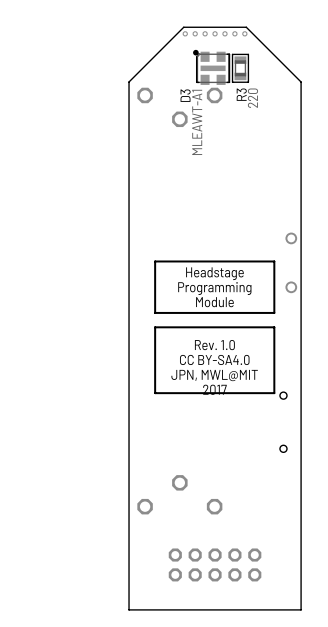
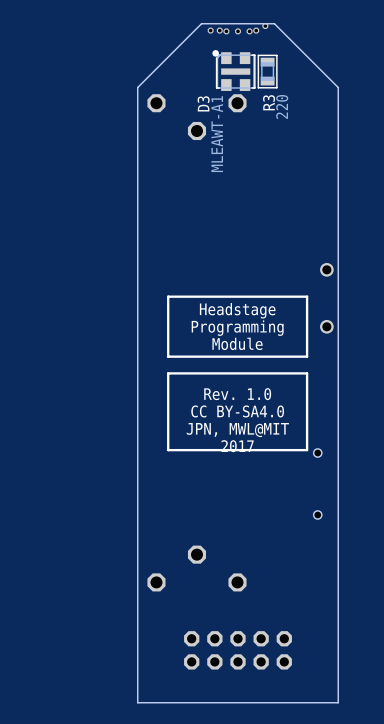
part: none -> (265, 26)
part: (185, 33) -> none
part: none -> (210, 30)
part: (195, 33) -> none
part: none -> (219, 30)
part: none -> (256, 30)
part: (234, 33) -> none
part: (244, 33) -> none

